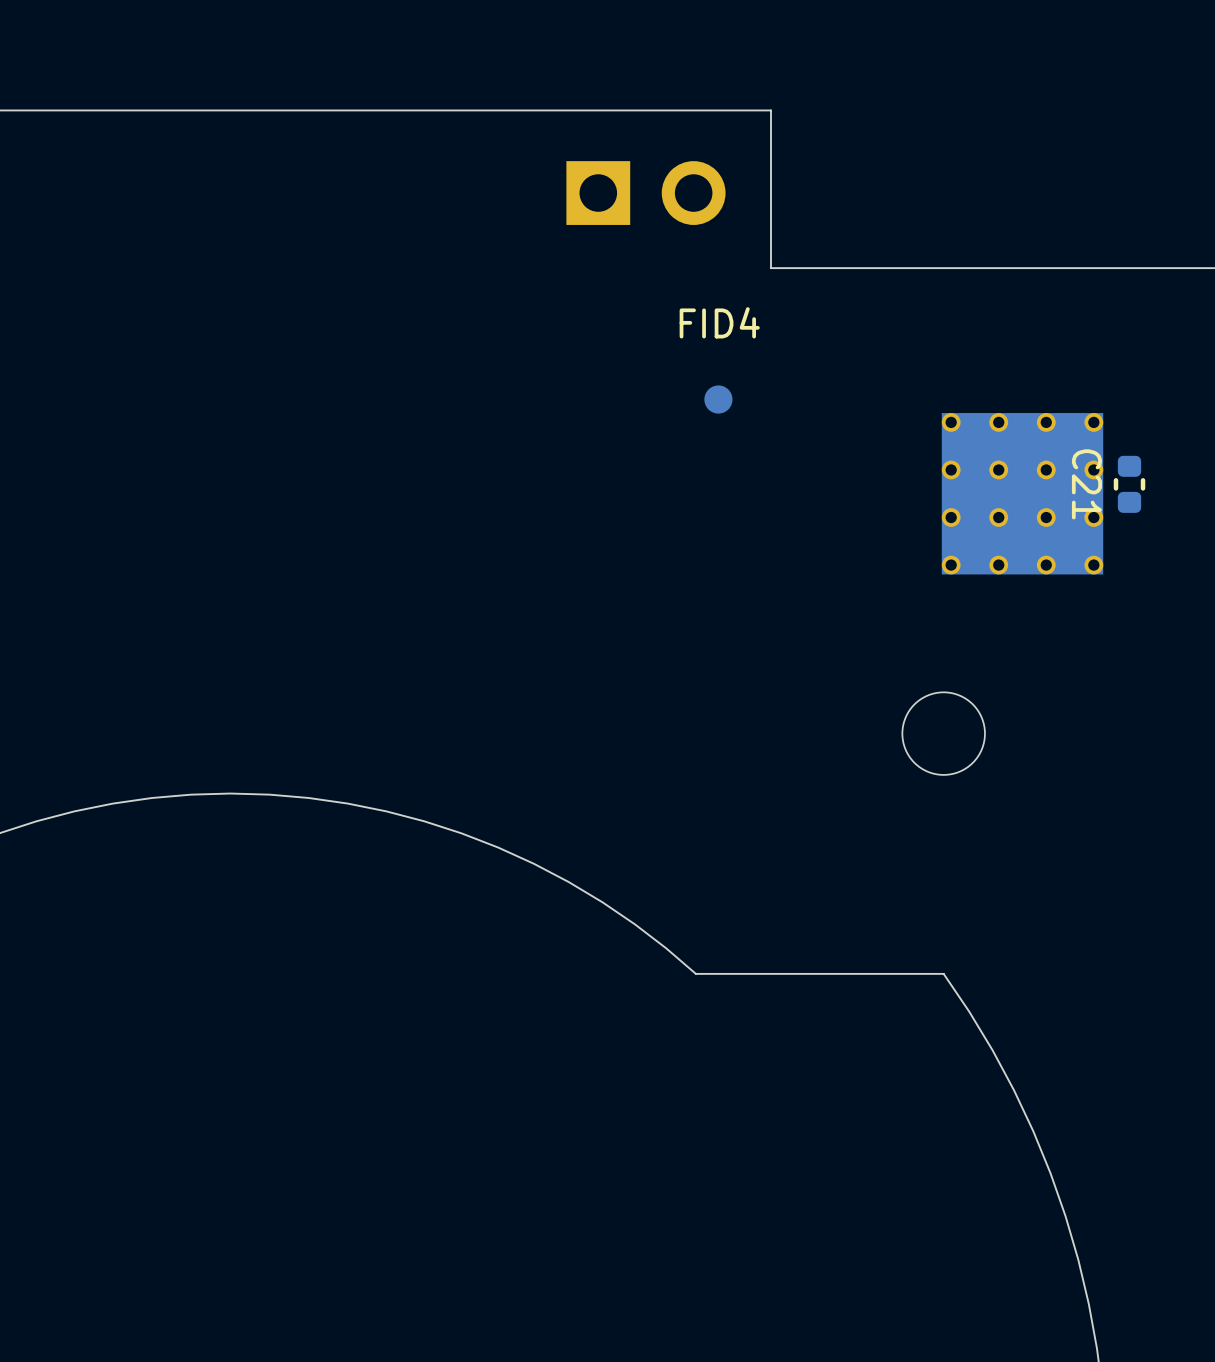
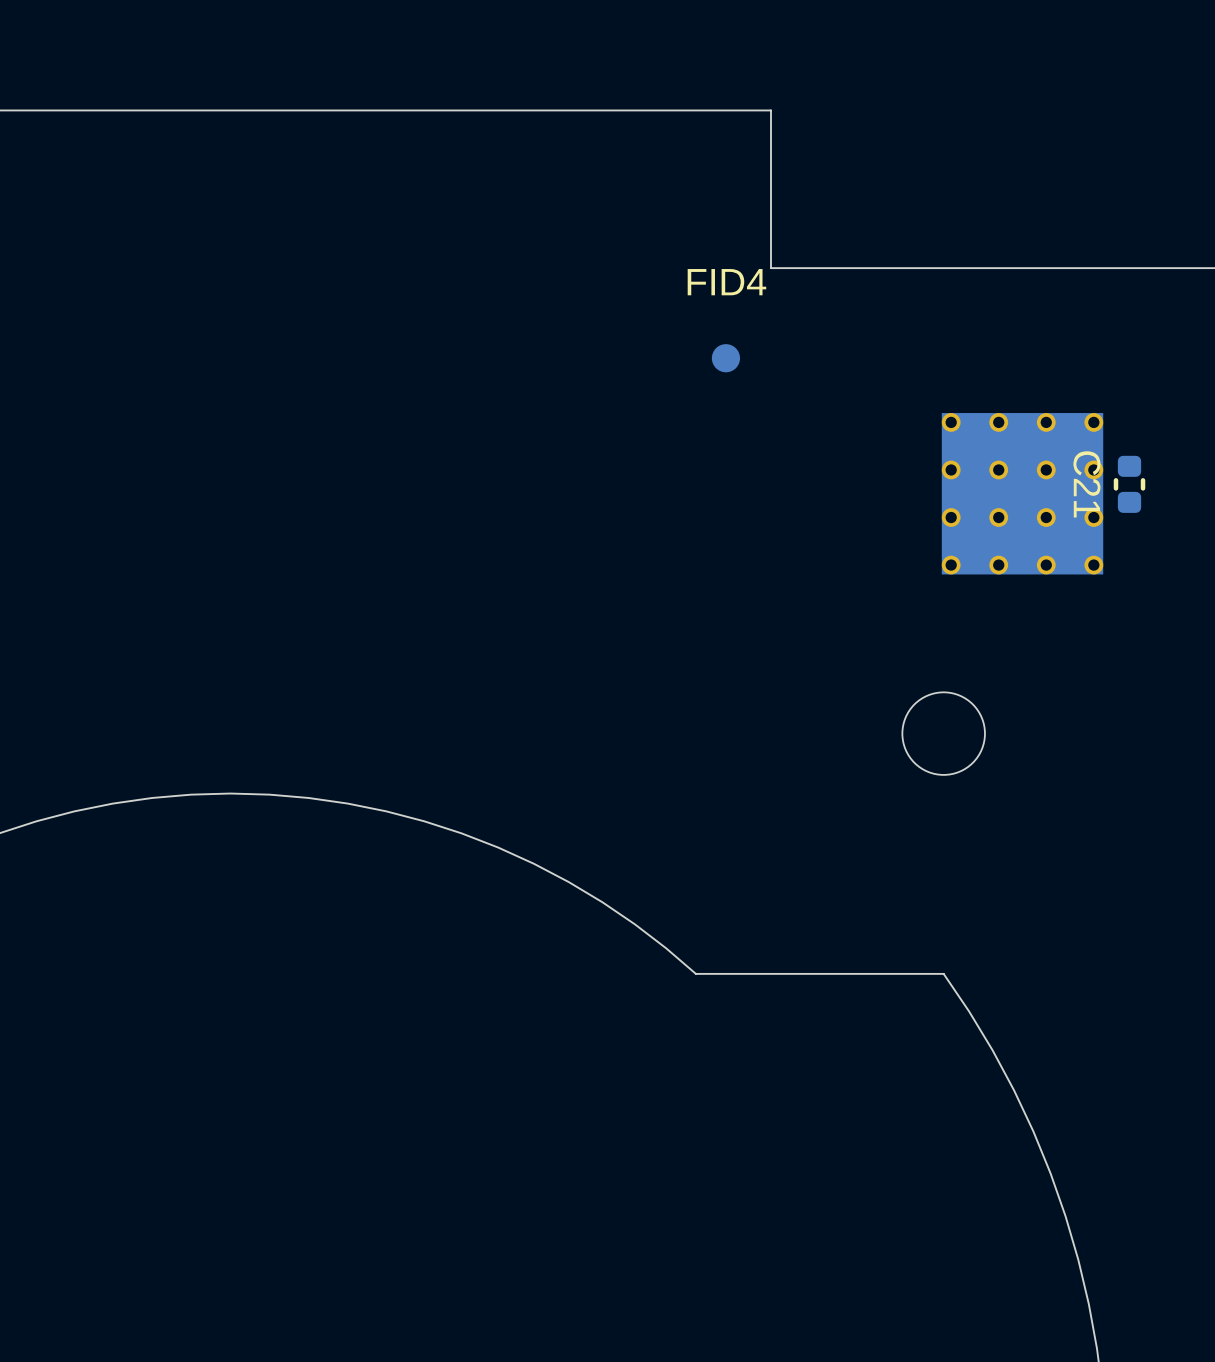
part: (645, 193) -> none
FID4 position: (718, 399) -> (725, 358)

